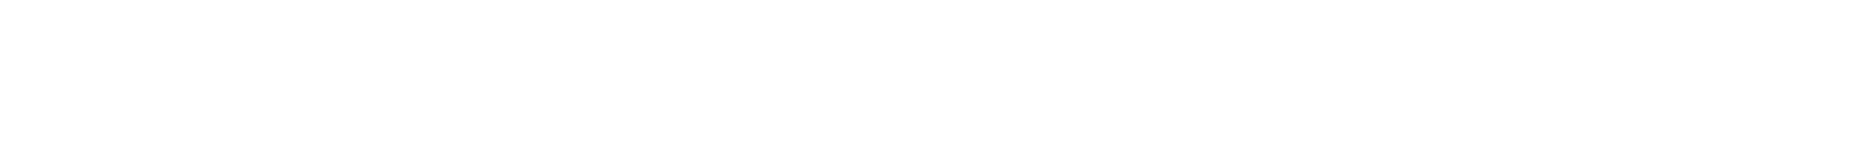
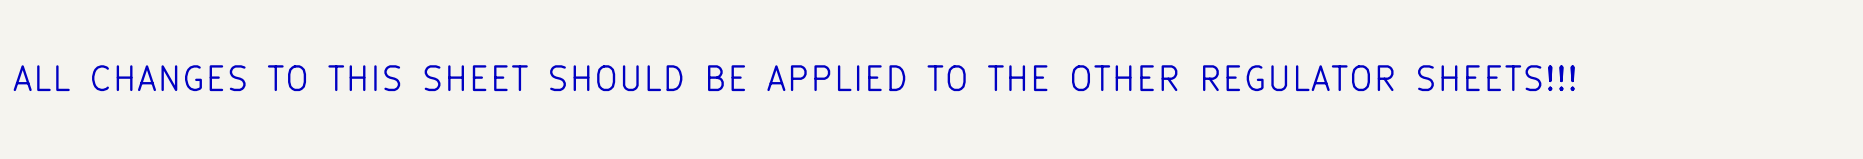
text: none -> ALL CHANGES TO THIS SHEET SHOULD BE APPLIED TO THE OTHER REGULATOR SHEETS!!! (794, 78)

